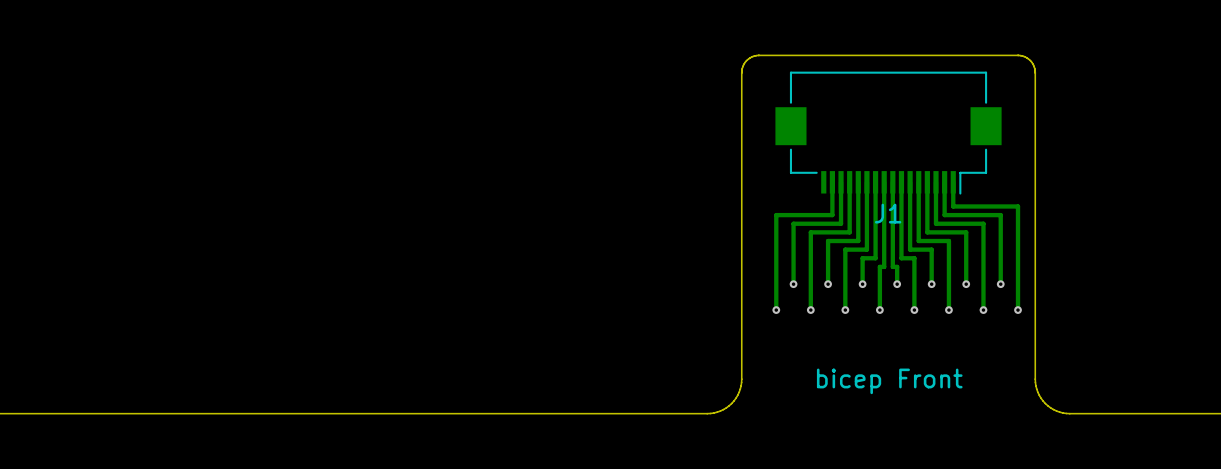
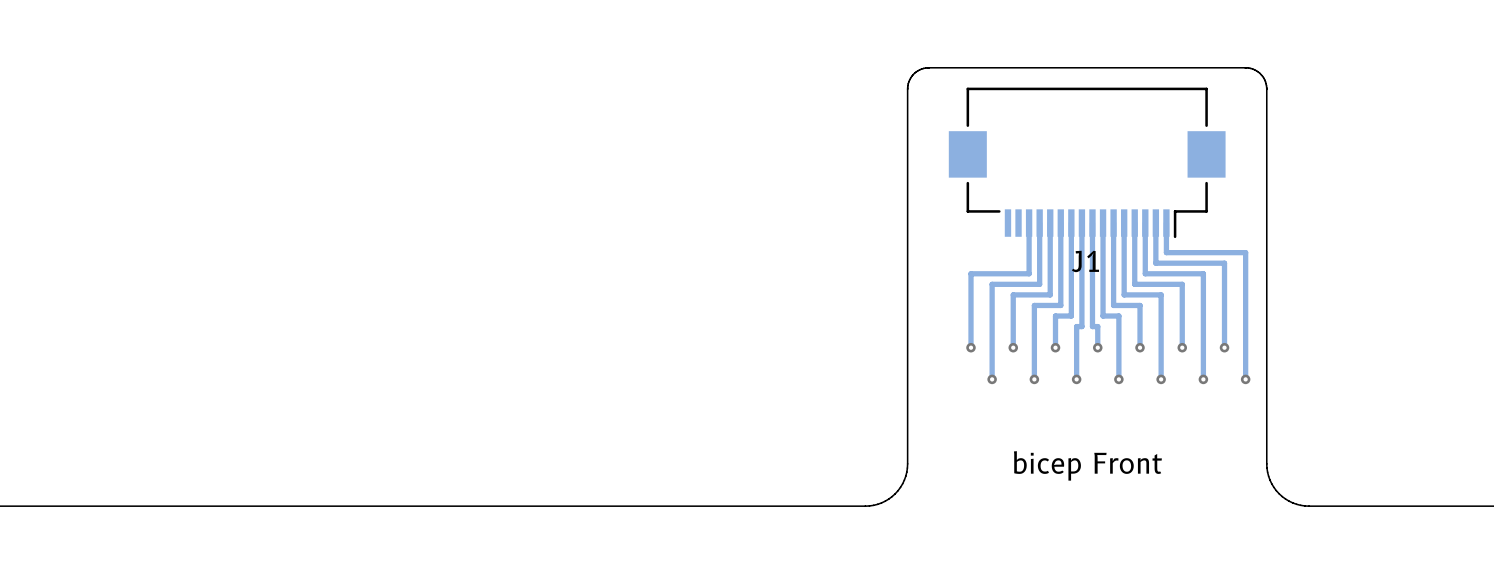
track: (832, 182) (832, 215) (776, 215) (776, 310) -> none
via: (776, 310) -> none

